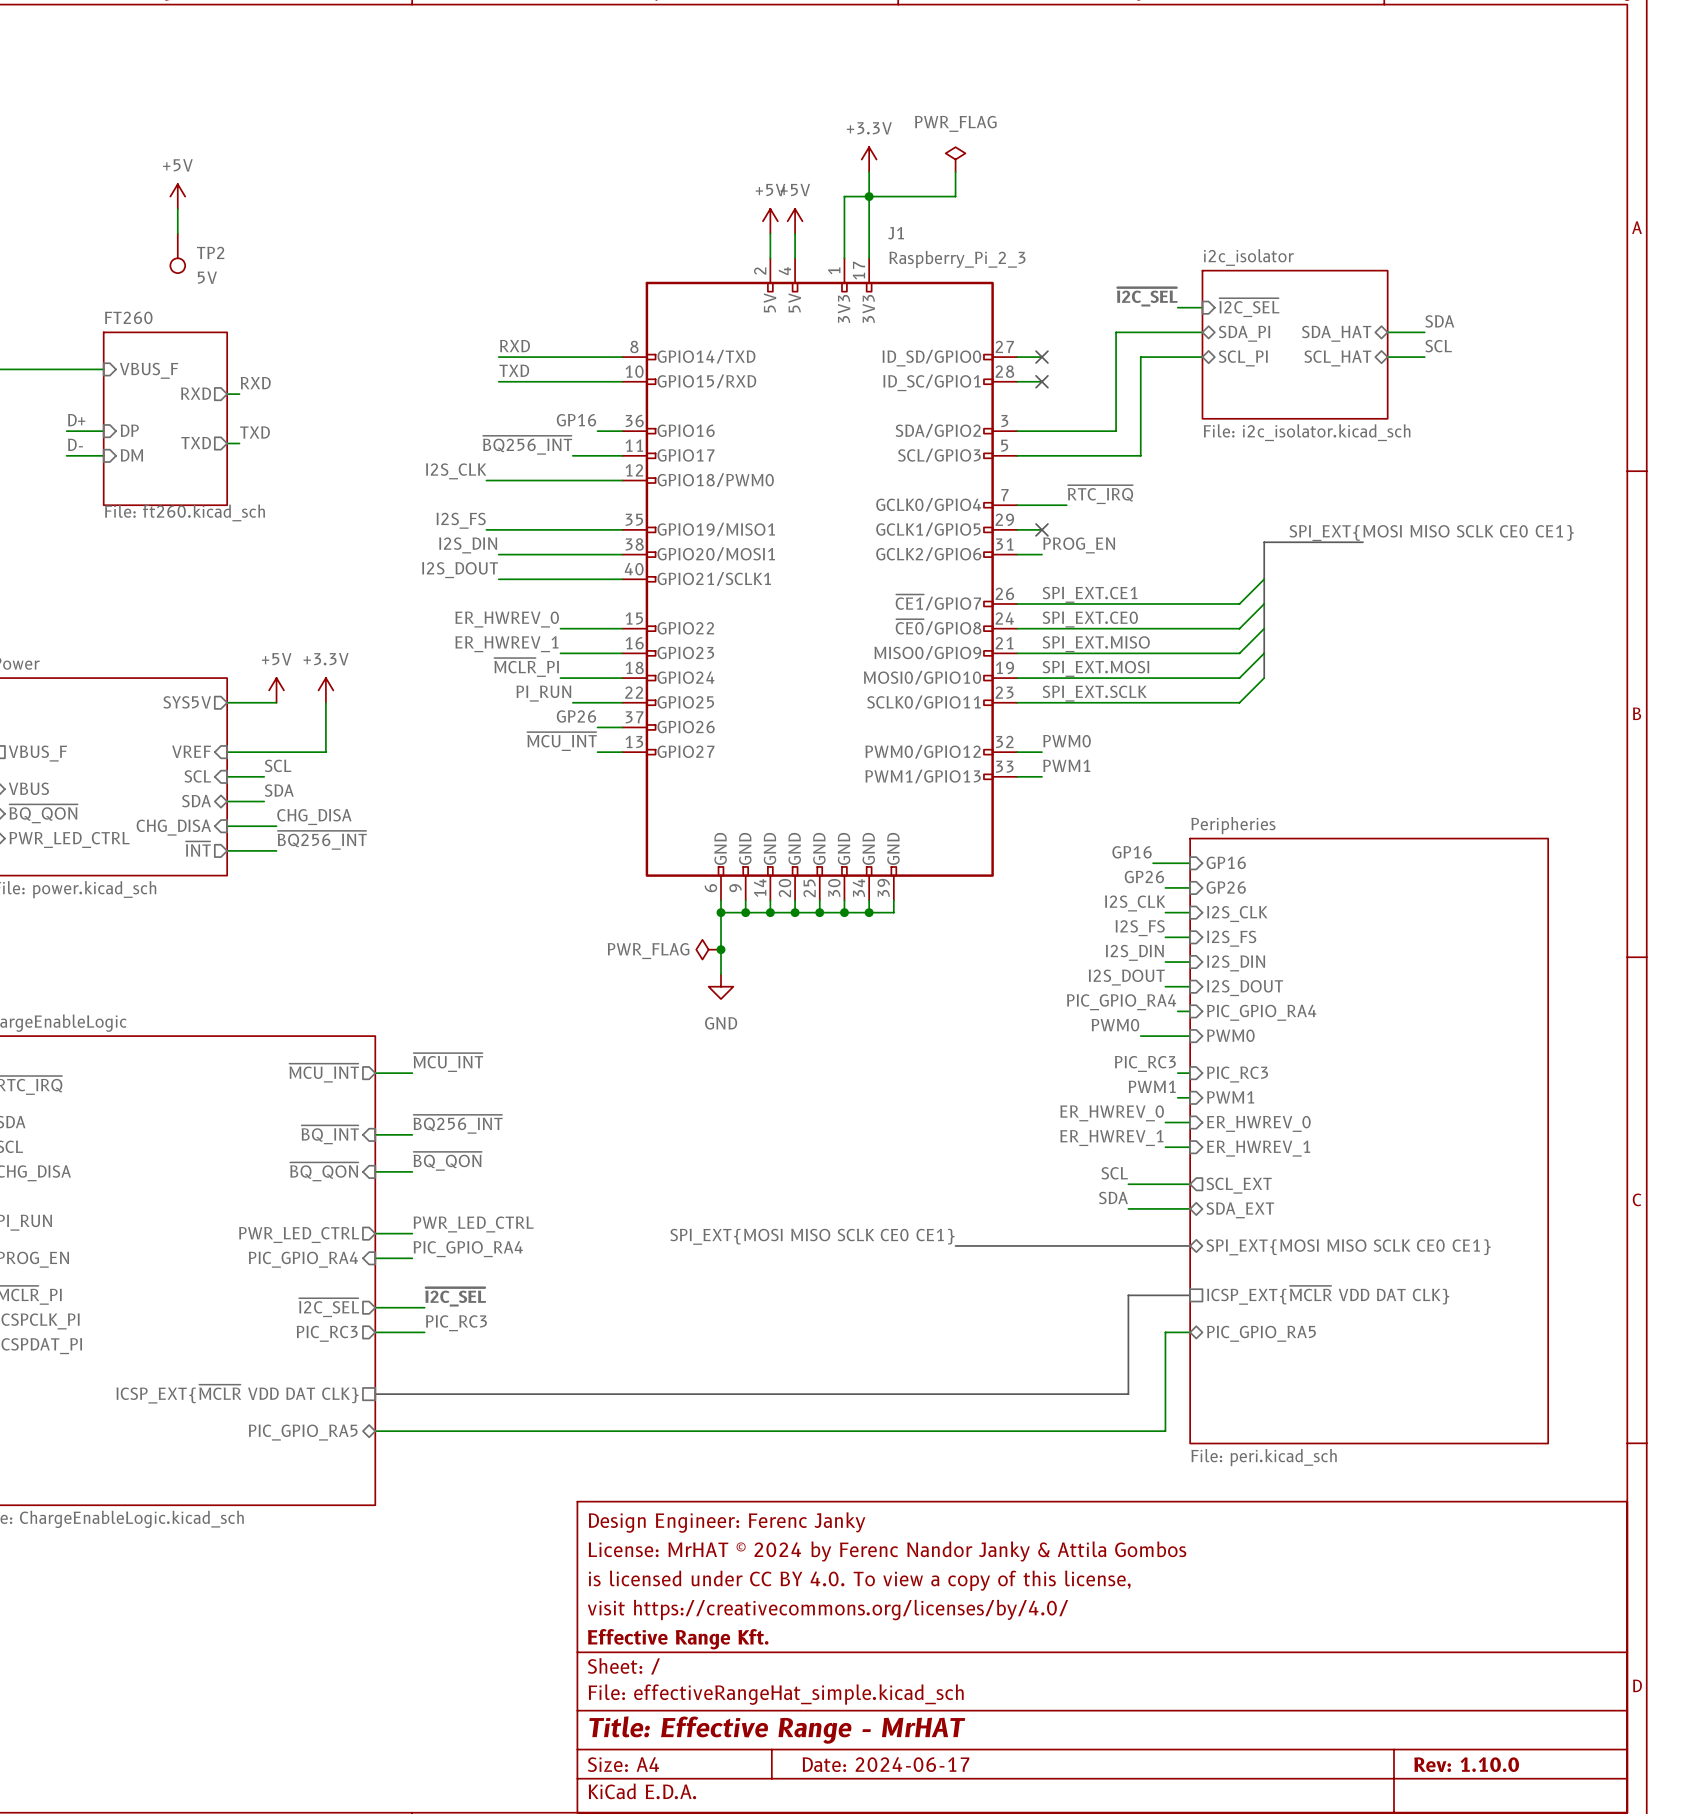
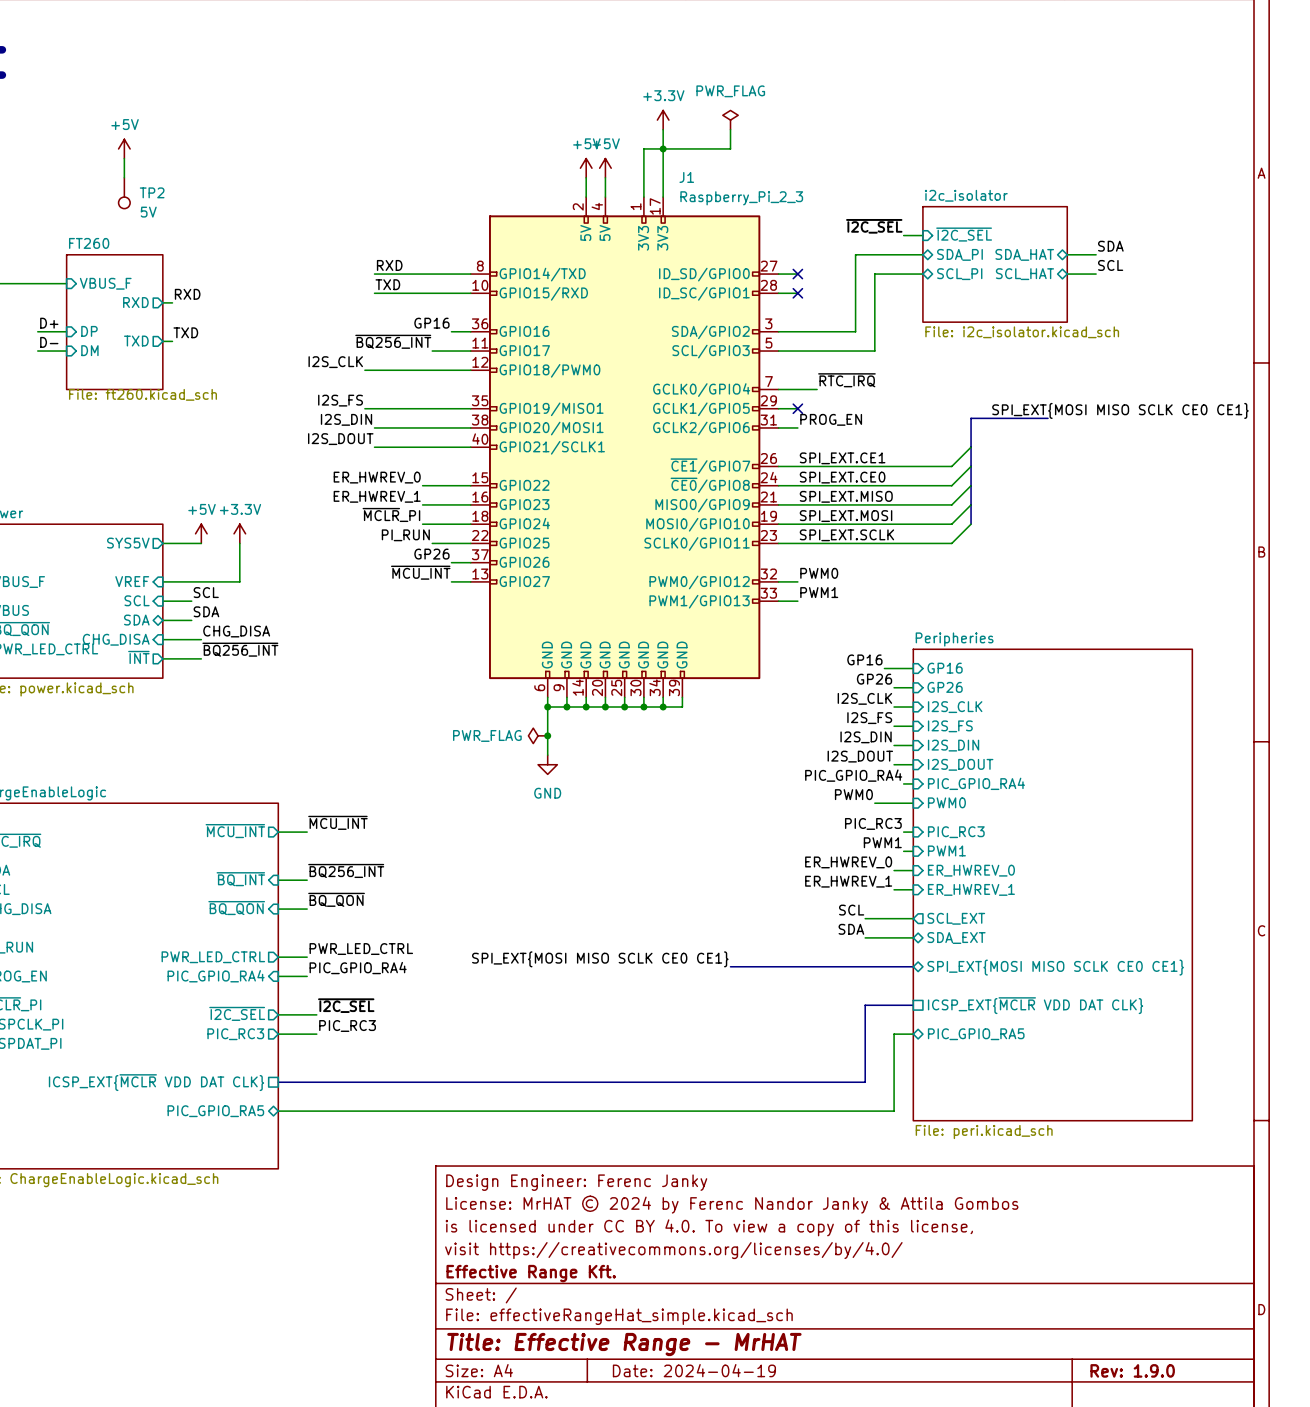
title block: Date: 2024-06-17 (885, 1764) -> Date: 2024-04-19 (694, 1370)
title block: Rev: 1.10.0 (1466, 1764) -> Rev: 1.9.0 (1132, 1370)

